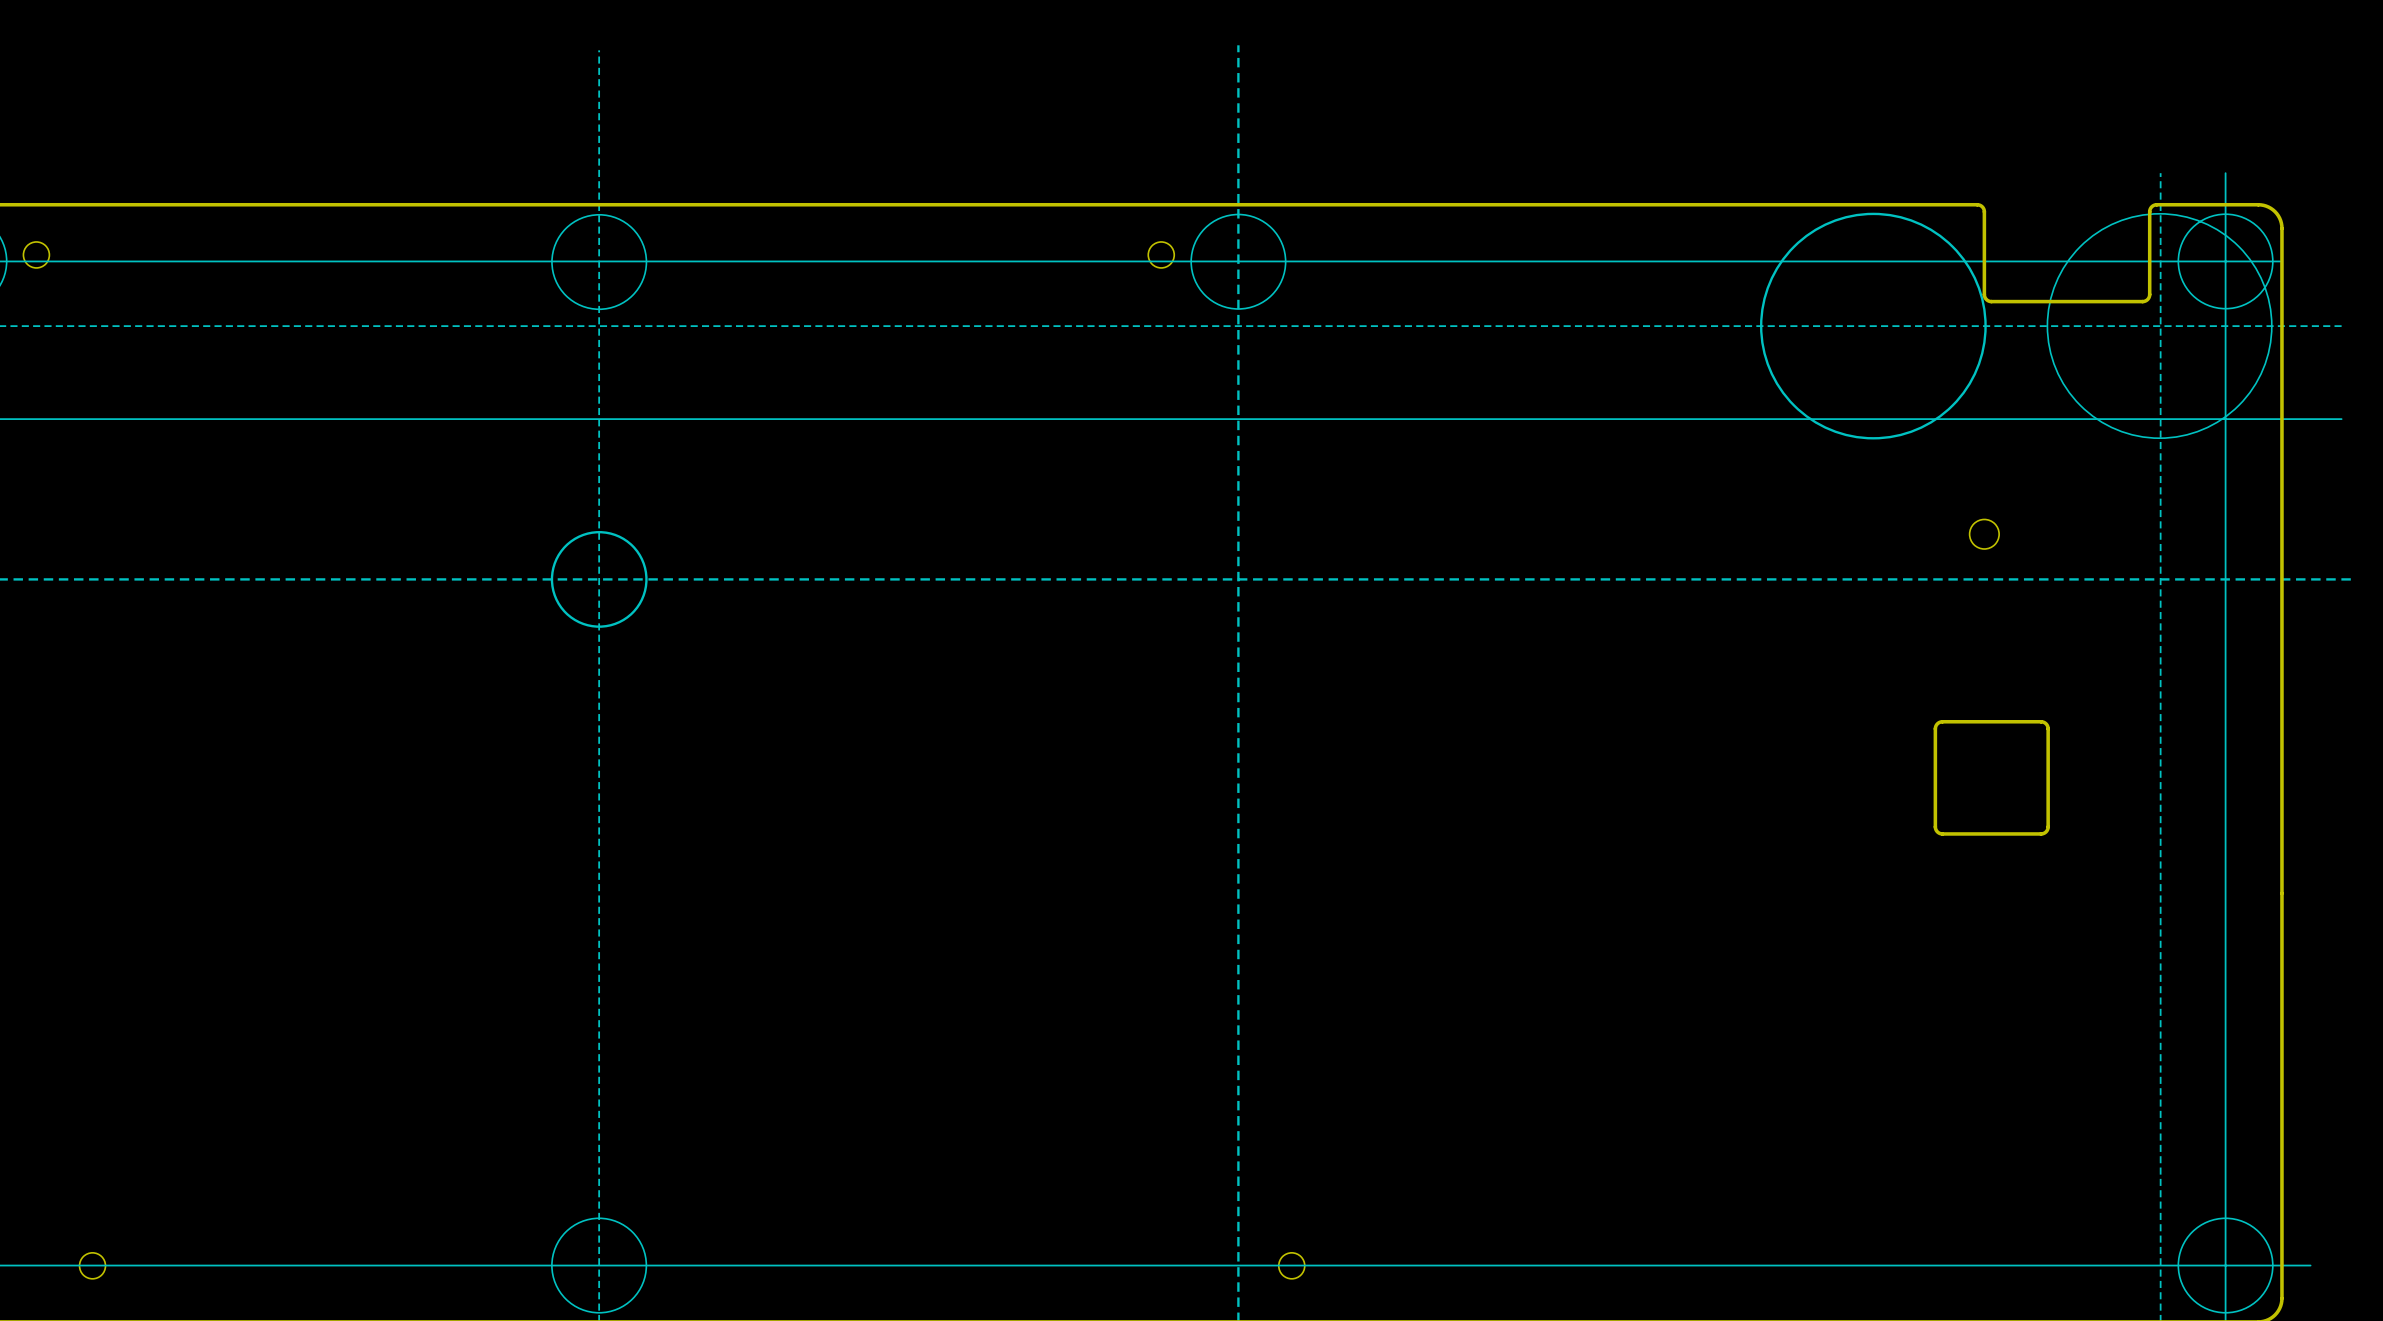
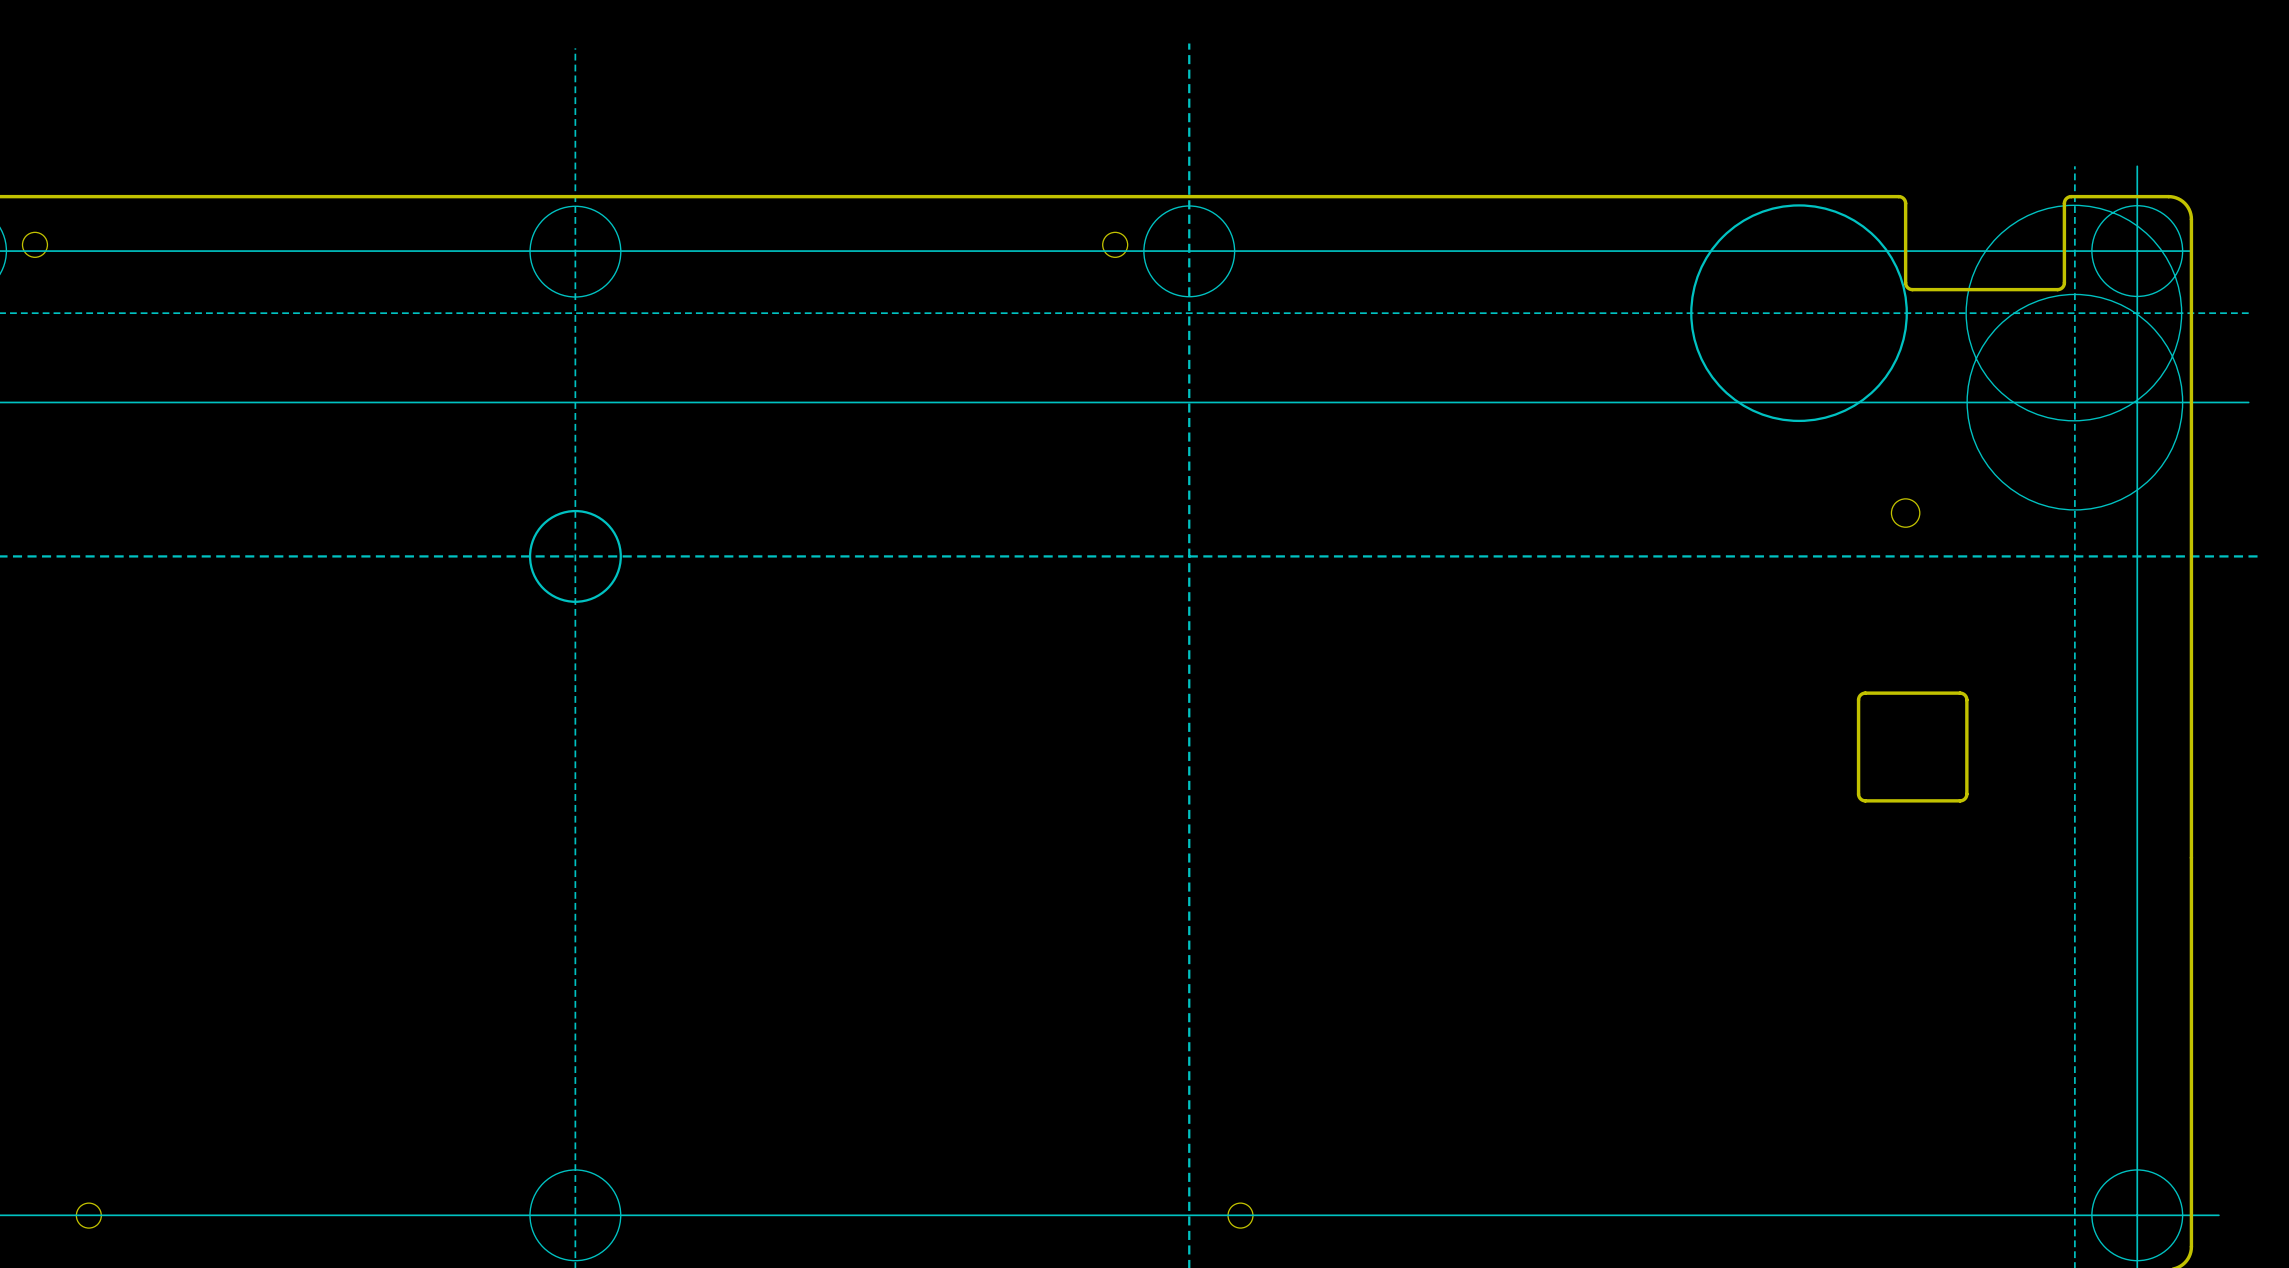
drawing: none -> [1966, 293, 2184, 511]

